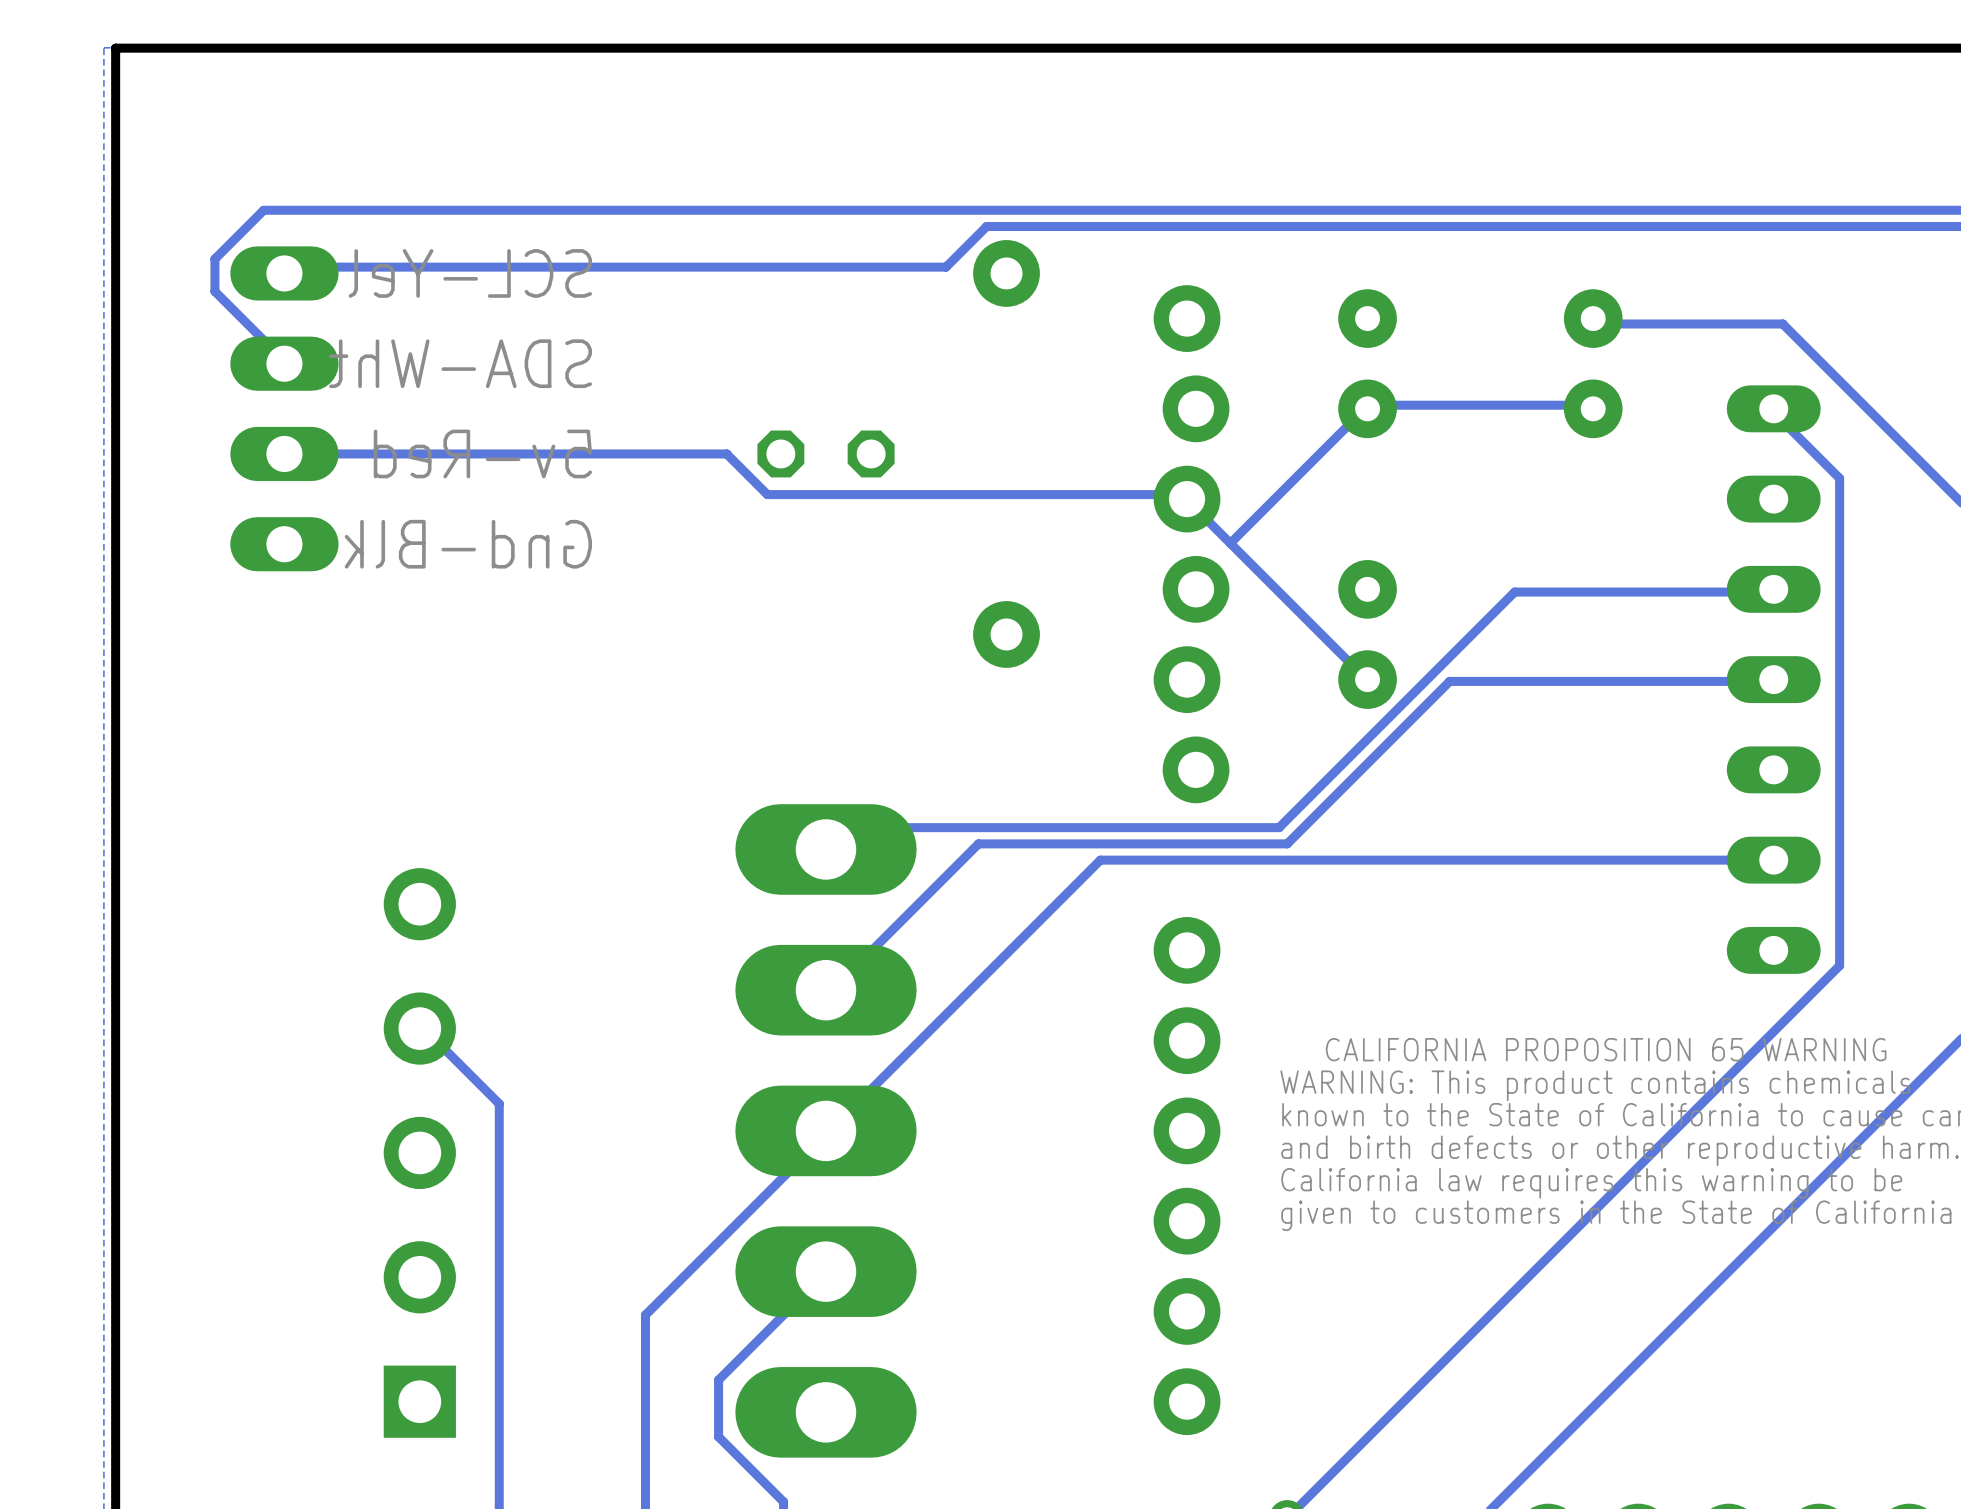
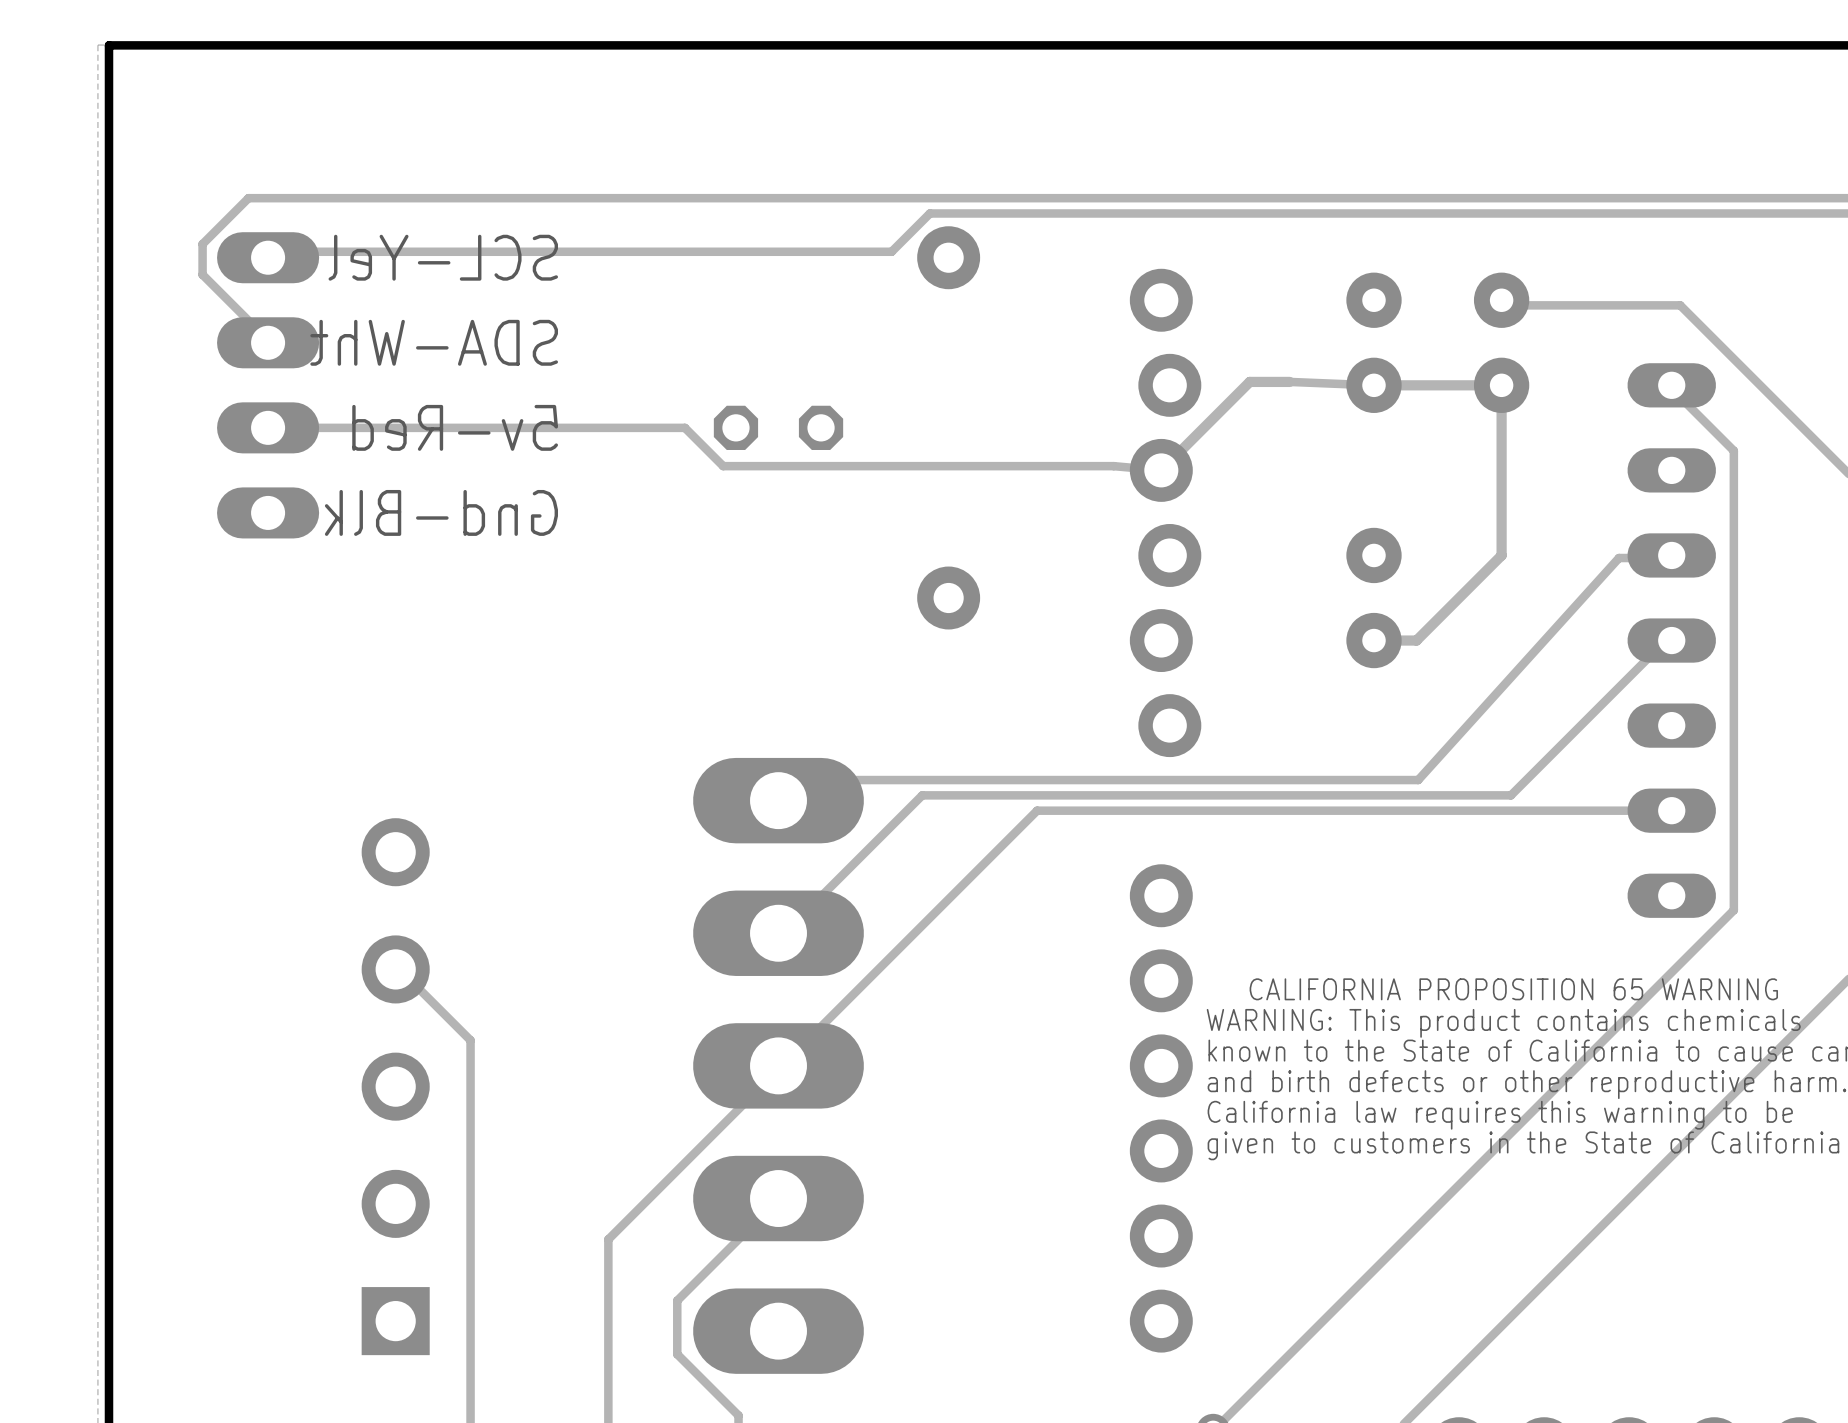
part position: (1367, 363) -> (1373, 342)
track: (1587, 405) (1368, 405) (1367, 408) (1360, 413) (1230, 543) -> none
track: (1181, 494) (1367, 679) -> (1113, 466) (1161, 470) (1249, 381) (1373, 385) (1501, 385) (1501, 555) (1416, 640) (1373, 640)
part position: (1191, 544) -> (1165, 512)
track: (1717, 592) (1514, 592) (1279, 827) -> (1619, 558) (1418, 780) (1205, 780)
part position: (1367, 634) -> (1373, 598)
track: (1765, 681) (1449, 681) (1287, 843) -> (1664, 642) (1510, 795) (1213, 795)
part position: (1187, 1176) -> (1161, 1108)

